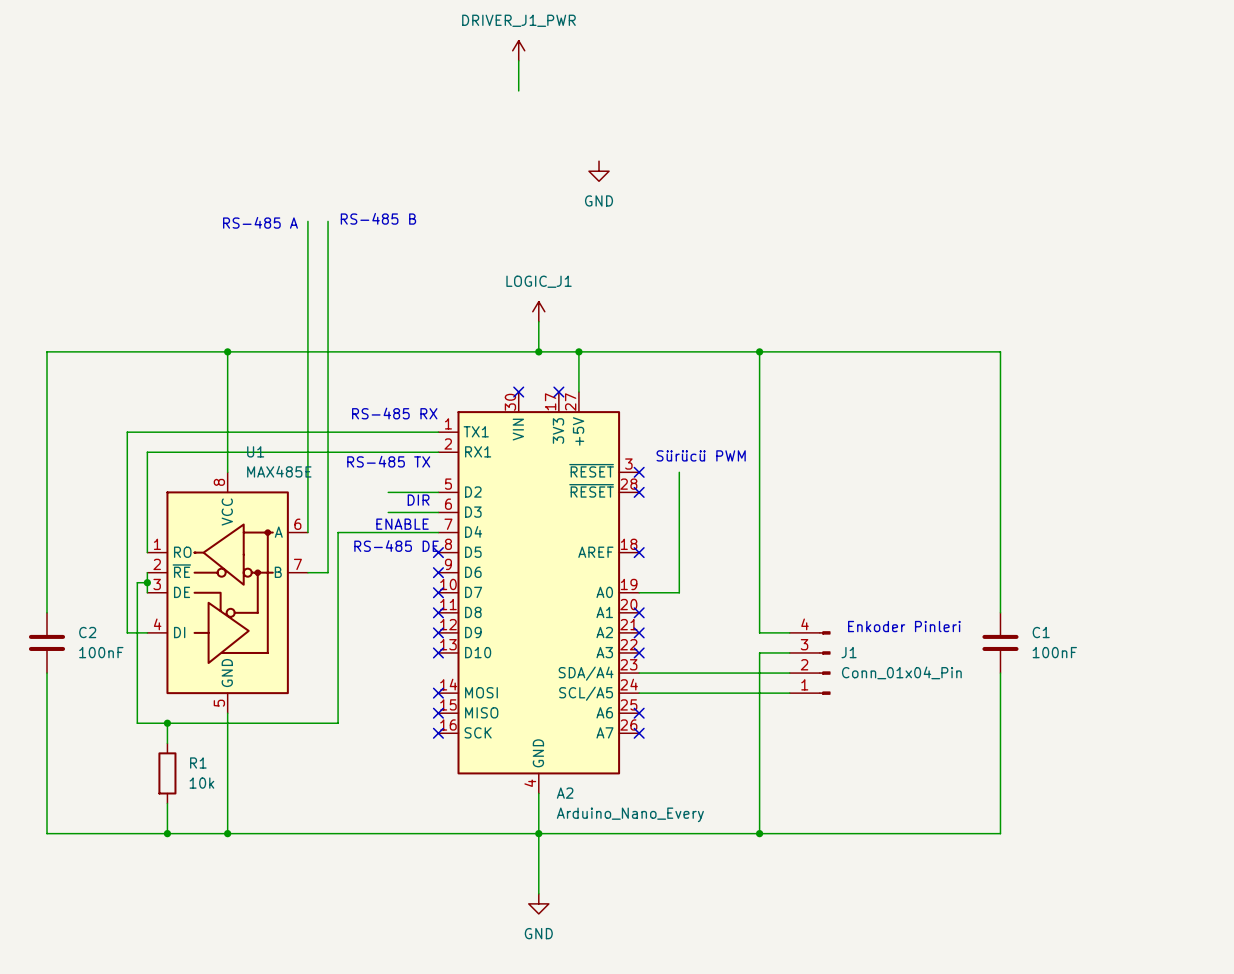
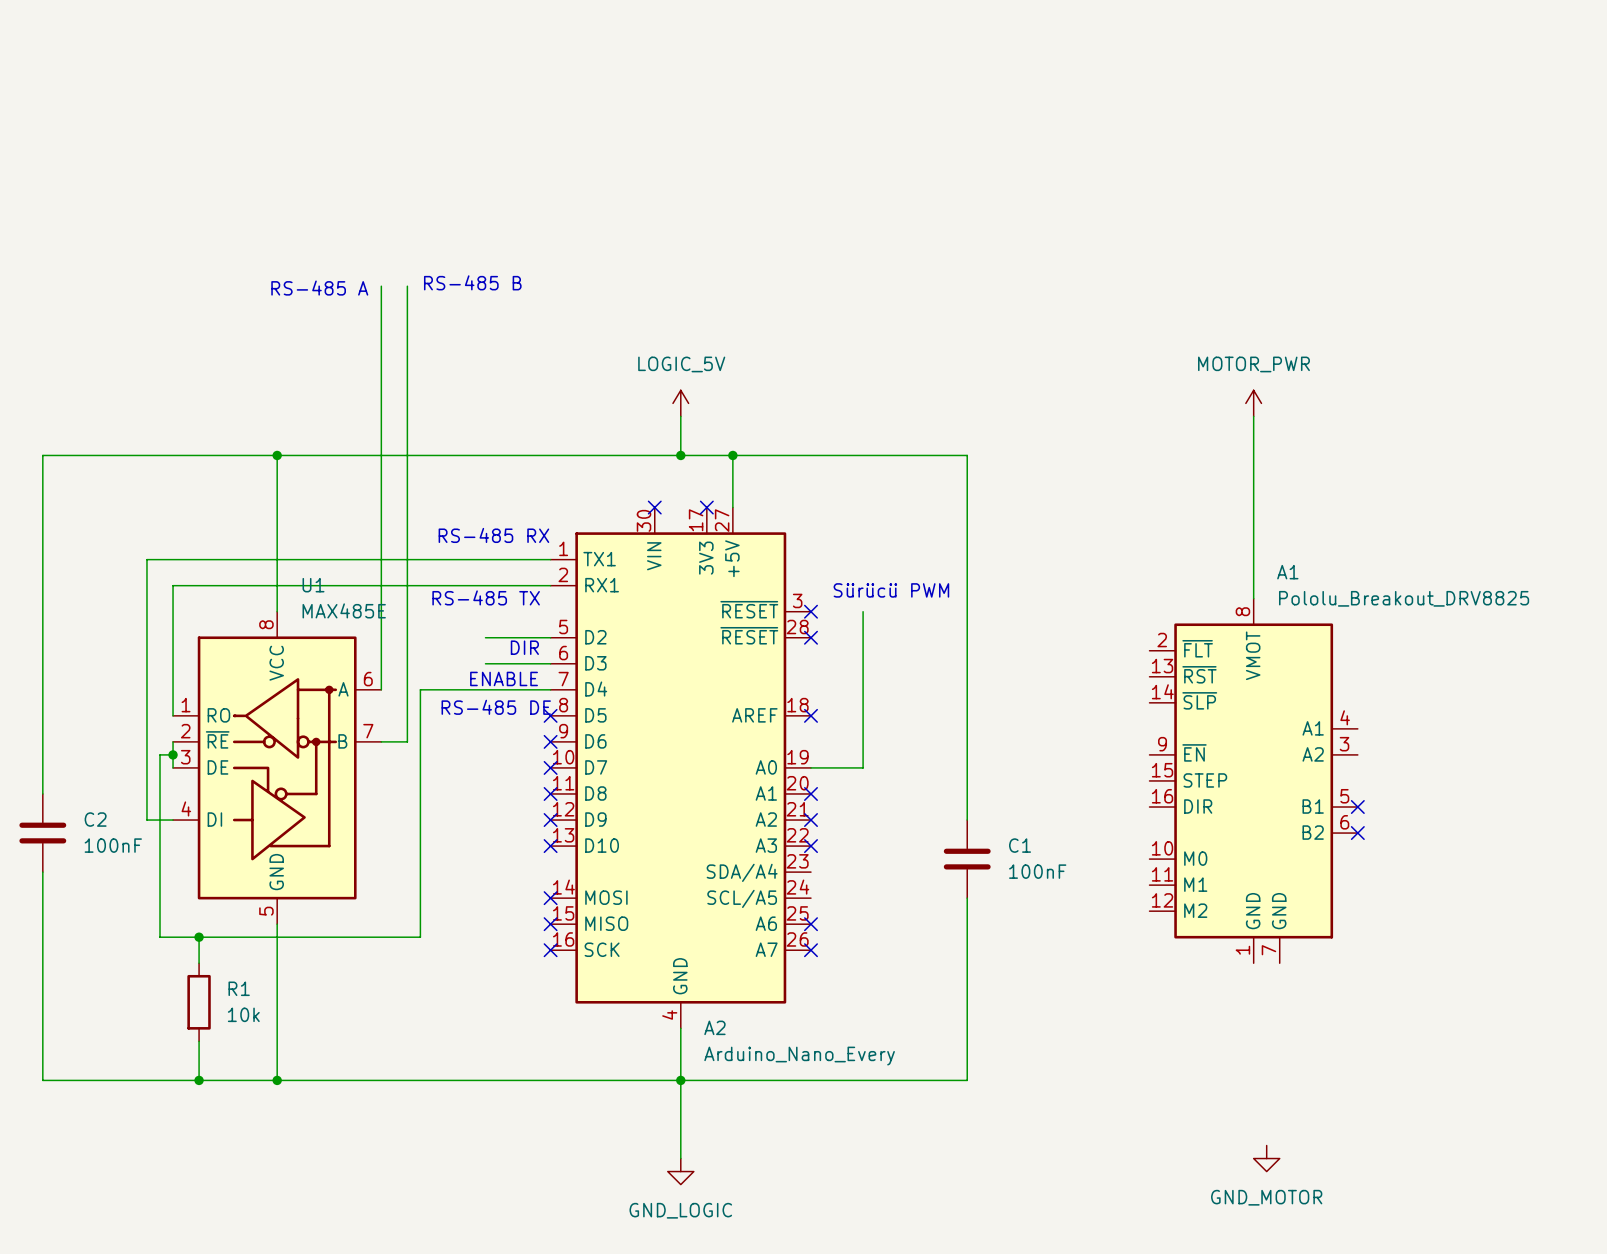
power symbol: DRIVER_J1_PWR (518, 50) -> none
wire: (518, 60) (518, 90) -> none
power symbol: GND (599, 171) -> none
power symbol: LOGIC_J1 (538, 311) -> LOGIC_5V (680, 403)
power symbol: none -> MOTOR_PWR (1253, 403)
wire: none -> (1253, 416) (1253, 598)
wire: (759, 351) (1000, 351) (1000, 612) -> none
junction: (759, 351) -> none
A1: none -> Pololu_Breakout_DRV8825 (1253, 780)
no-connect mark: none -> (1357, 807)
text: Enkoder Pinleri (904, 626) -> none
wire: (759, 632) (789, 632) -> none
C1 position: (1000, 642) -> (967, 859)
no-connect mark: none -> (1357, 833)
wire: (789, 652) (759, 652) (759, 693) -> none
J1: Conn_01x04_Pin (810, 663) -> none
wire: (639, 673) (789, 673) -> none
wire: (1000, 673) (1000, 833) (759, 833) -> none
wire: (639, 693) (789, 693) -> none
junction: (759, 833) -> none
power symbol: none -> GND_MOTOR (1266, 1158)
power symbol: GND (538, 903) -> GND_LOGIC (680, 1171)

